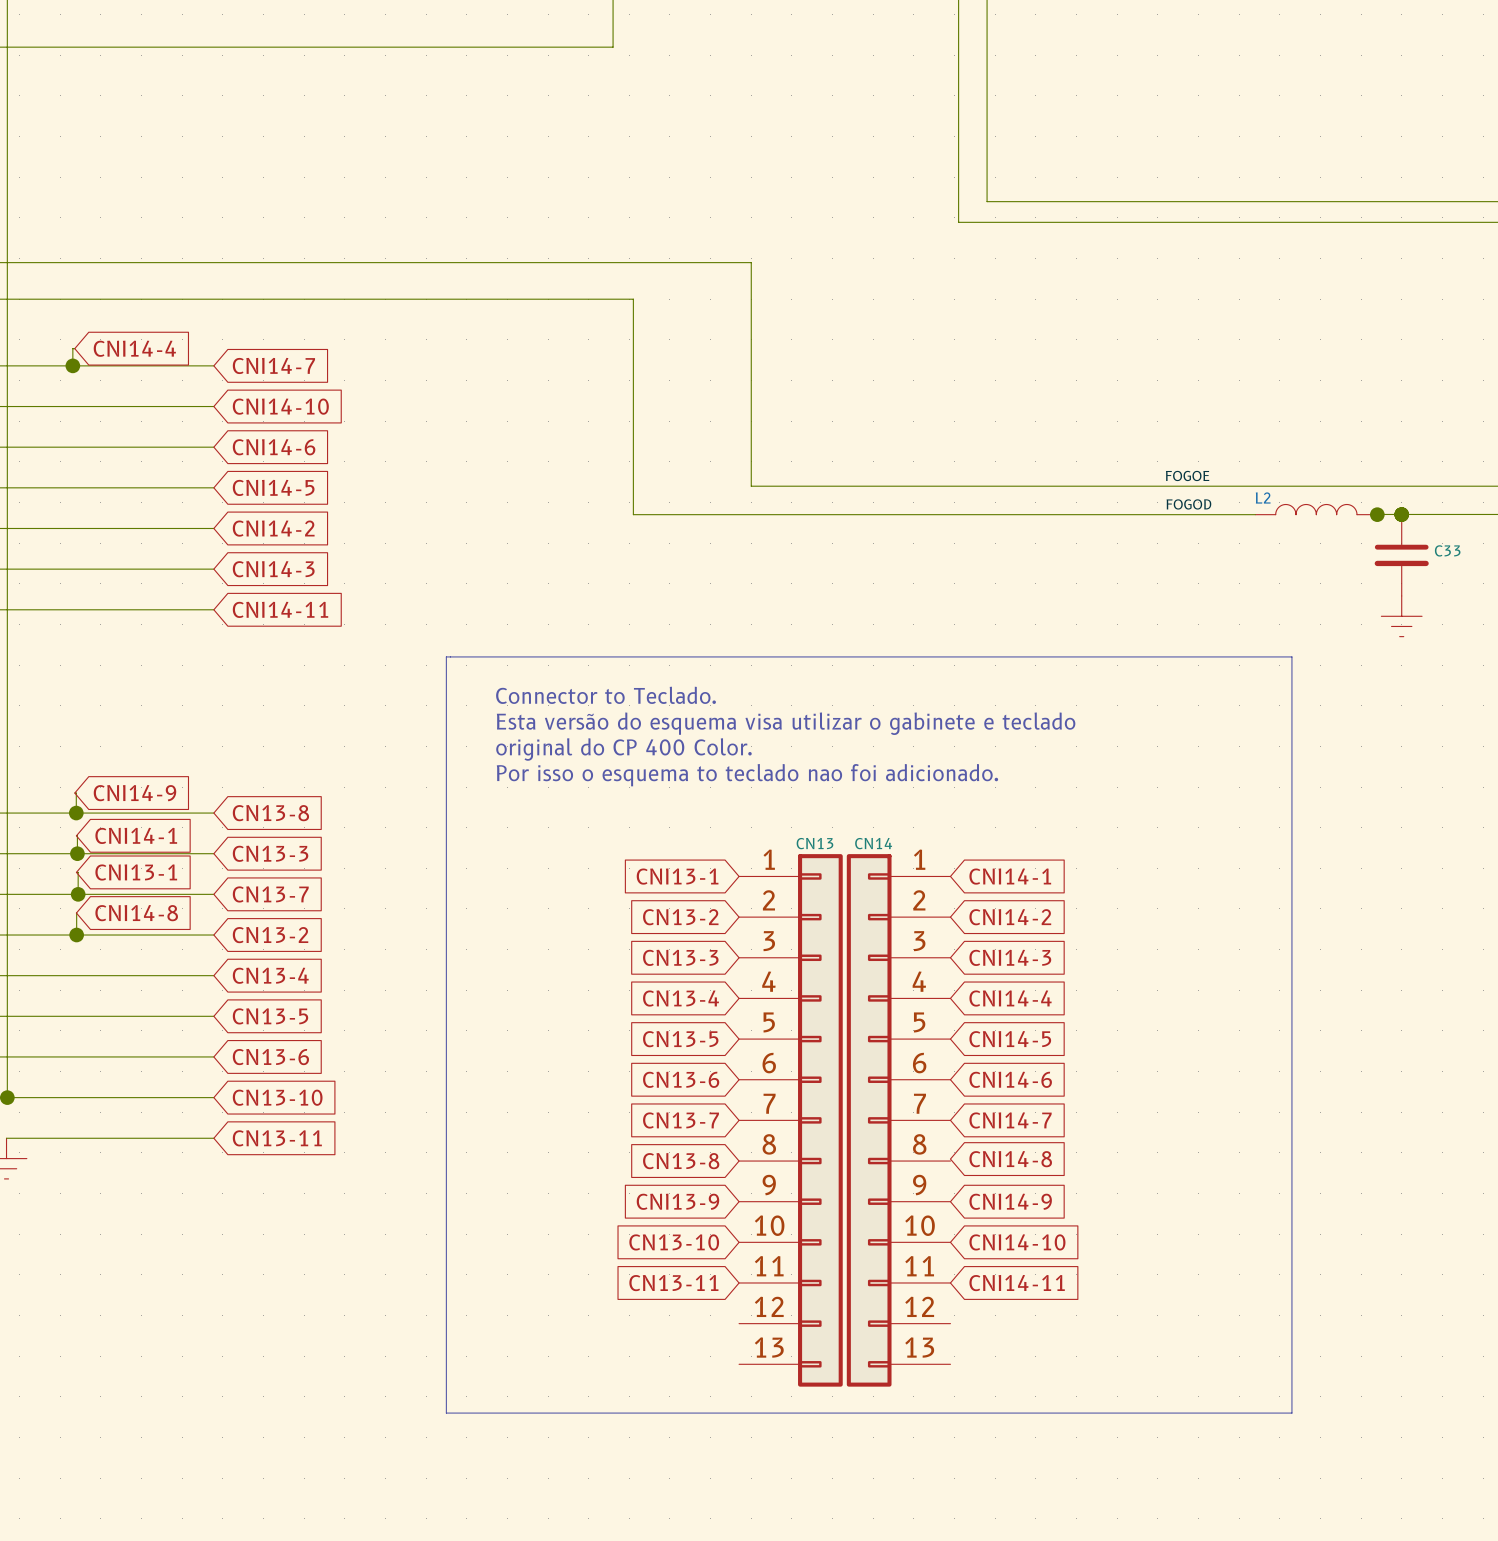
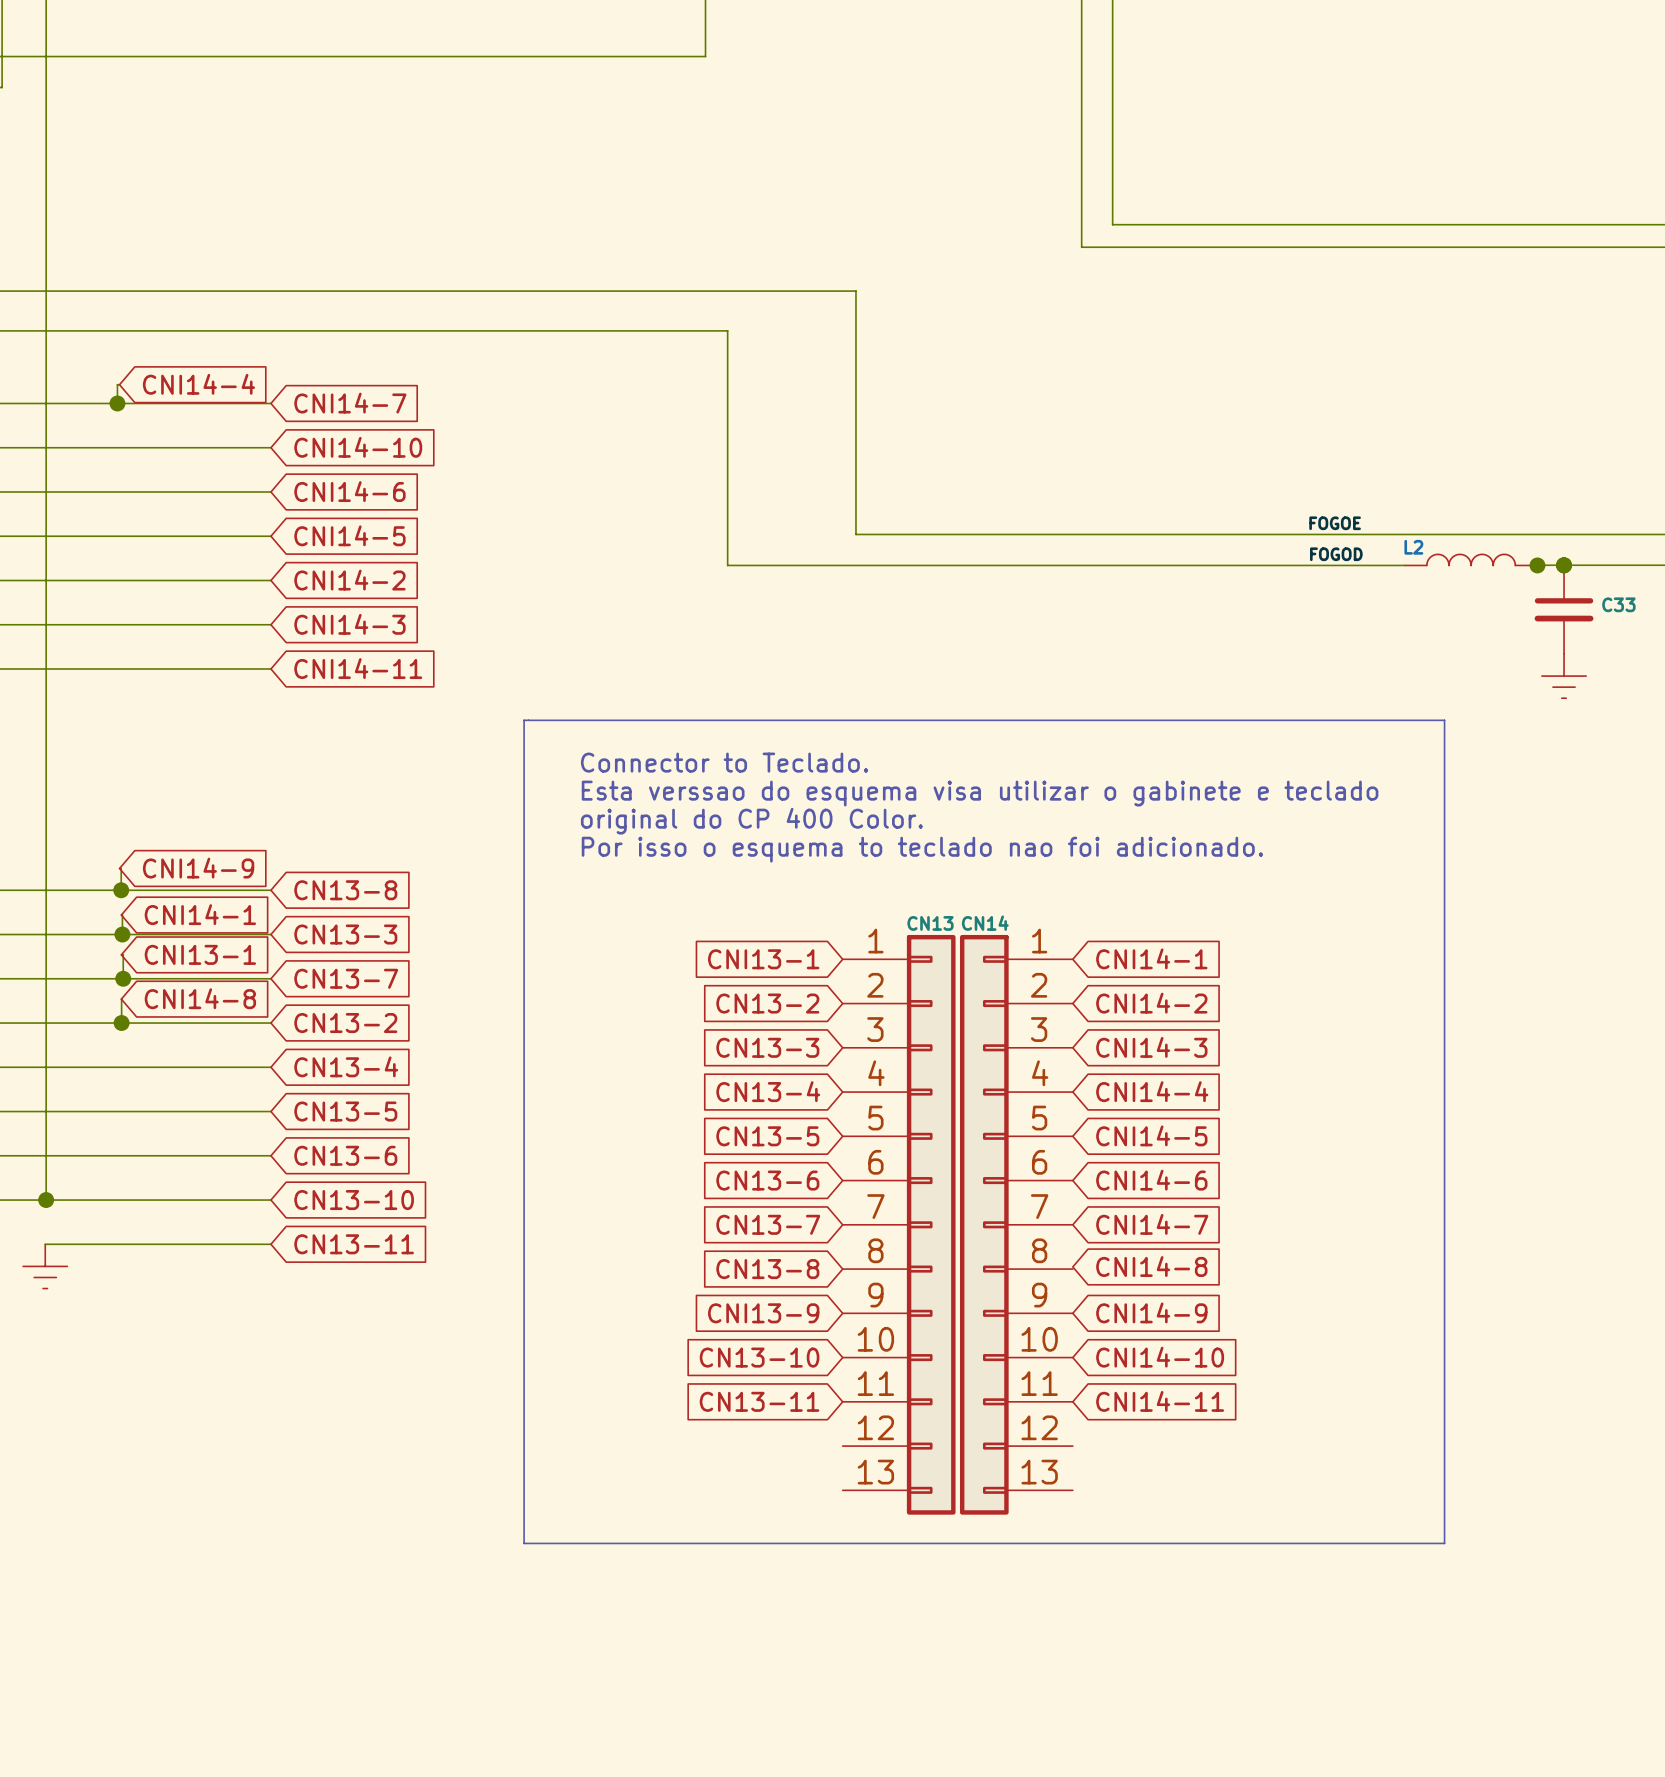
text: Esta versão do esquema visa utilizar o gabinete e teclado (786, 723) -> Esta verssao do esquema visa utilizar o gabinete e teclado (980, 793)

